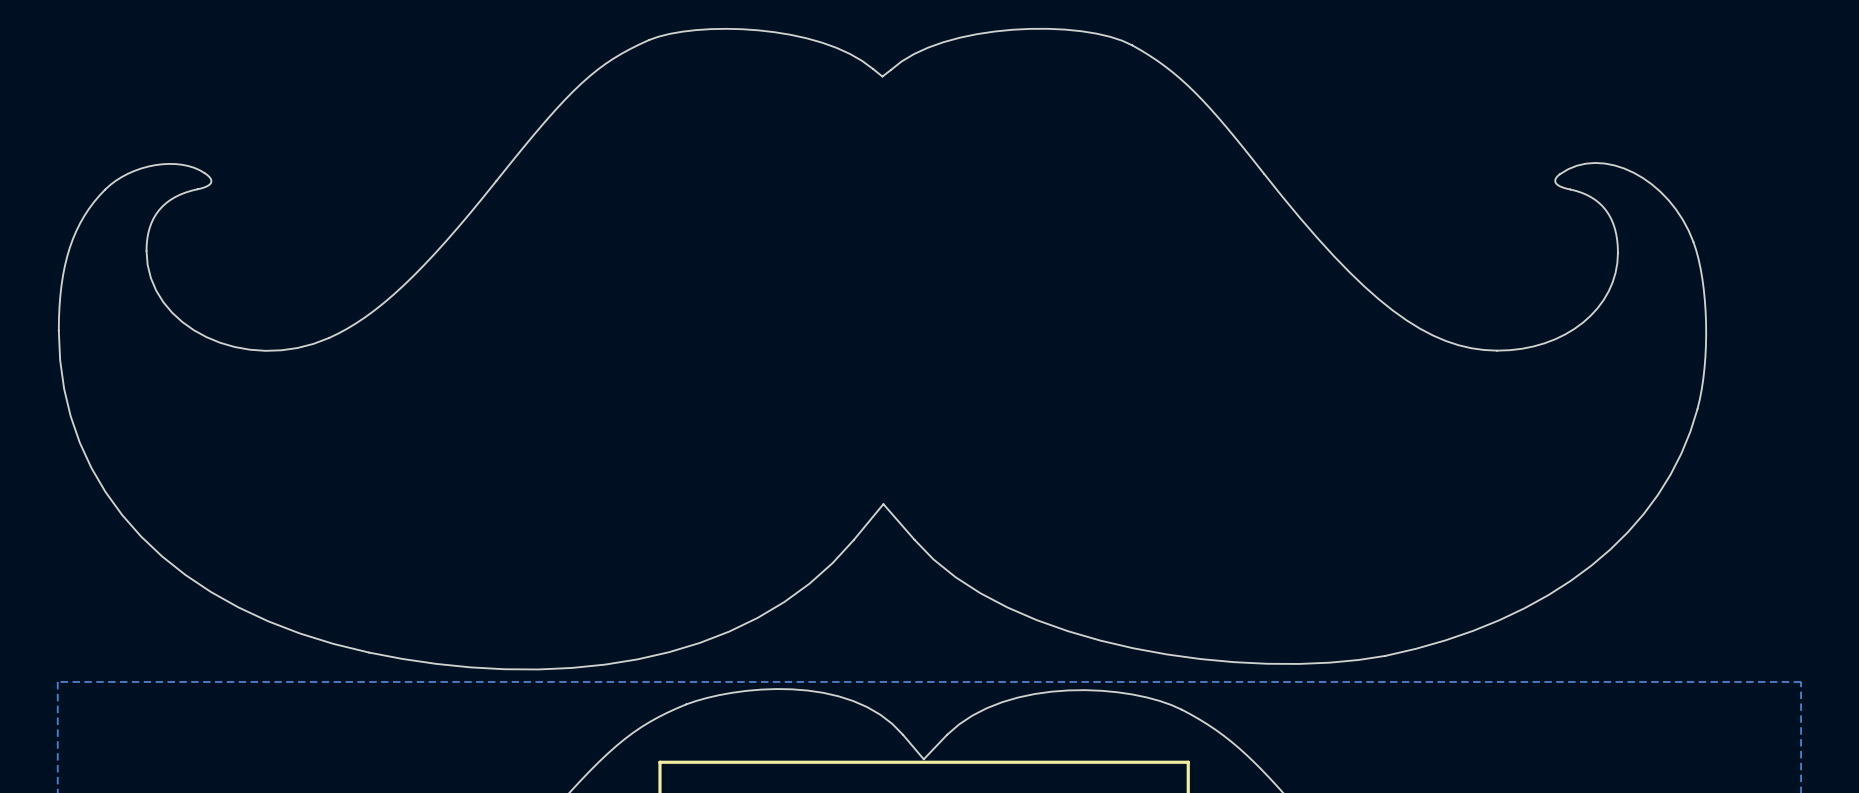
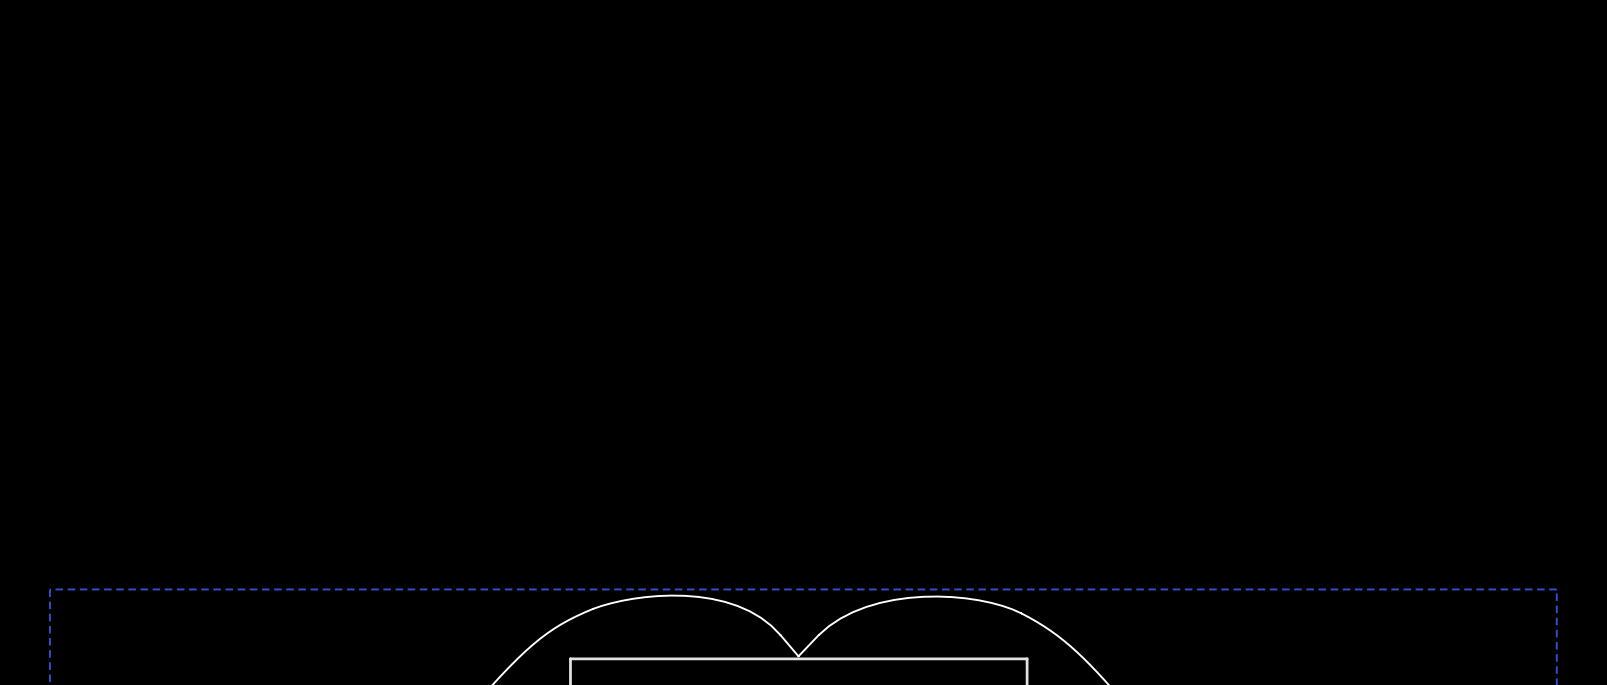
board edge: (649, 39) (605, 63) (573, 91) (534, 134) (445, 241) (393, 295) (355, 323) (313, 343) (281, 350) (265, 350) (234, 347) (220, 342) (193, 330) (172, 312) (163, 302) (150, 278) (147, 264) (146, 244) (149, 227) (159, 210) (170, 199) (209, 184) (211, 179) (207, 174) (194, 167) (182, 164) (155, 165) (128, 173) (105, 189) (88, 208) (80, 223) (67, 256) (59, 306) (60, 360) (64, 388) (79, 442) (105, 492) (140, 536) (185, 574) (210, 591) (268, 621) (299, 633) (333, 643) (402, 658) (470, 667) (538, 669) (605, 664) (637, 659) (699, 642) (729, 631) (784, 602) (809, 583) (832, 563) (883, 504) (933, 559) (955, 577) (980, 593) (1036, 620) (1100, 640) (1166, 654) (1234, 662) (1329, 662) (1385, 655) (1445, 640) (1499, 620) (1524, 608) (1570, 581) (1610, 549) (1643, 513) (1670, 474) (1690, 431) (1701, 389) (1705, 345) (1704, 300) (1698, 259) (1688, 230) (1668, 200) (1651, 184) (1624, 168) (1604, 163) (1585, 163) (1568, 169) (1555, 179) (1559, 185) (1581, 192) (1595, 199) (1606, 210) (1613, 223) (1617, 246) (1615, 272) (1608, 291) (1597, 308) (1574, 328) (1544, 343) (1509, 350) (1484, 350) (1458, 345) (1432, 335) (1406, 320) (1378, 299) (1349, 272) (1317, 238) (1226, 127) (1195, 92) (1157, 61) (1122, 40) (1096, 33) (1065, 29) (1030, 28) (994, 31) (959, 37) (928, 47) (901, 61) (882, 76) (862, 60) (836, 47) (806, 38) (774, 32) (710, 29) (669, 33) (649, 39) -> none

